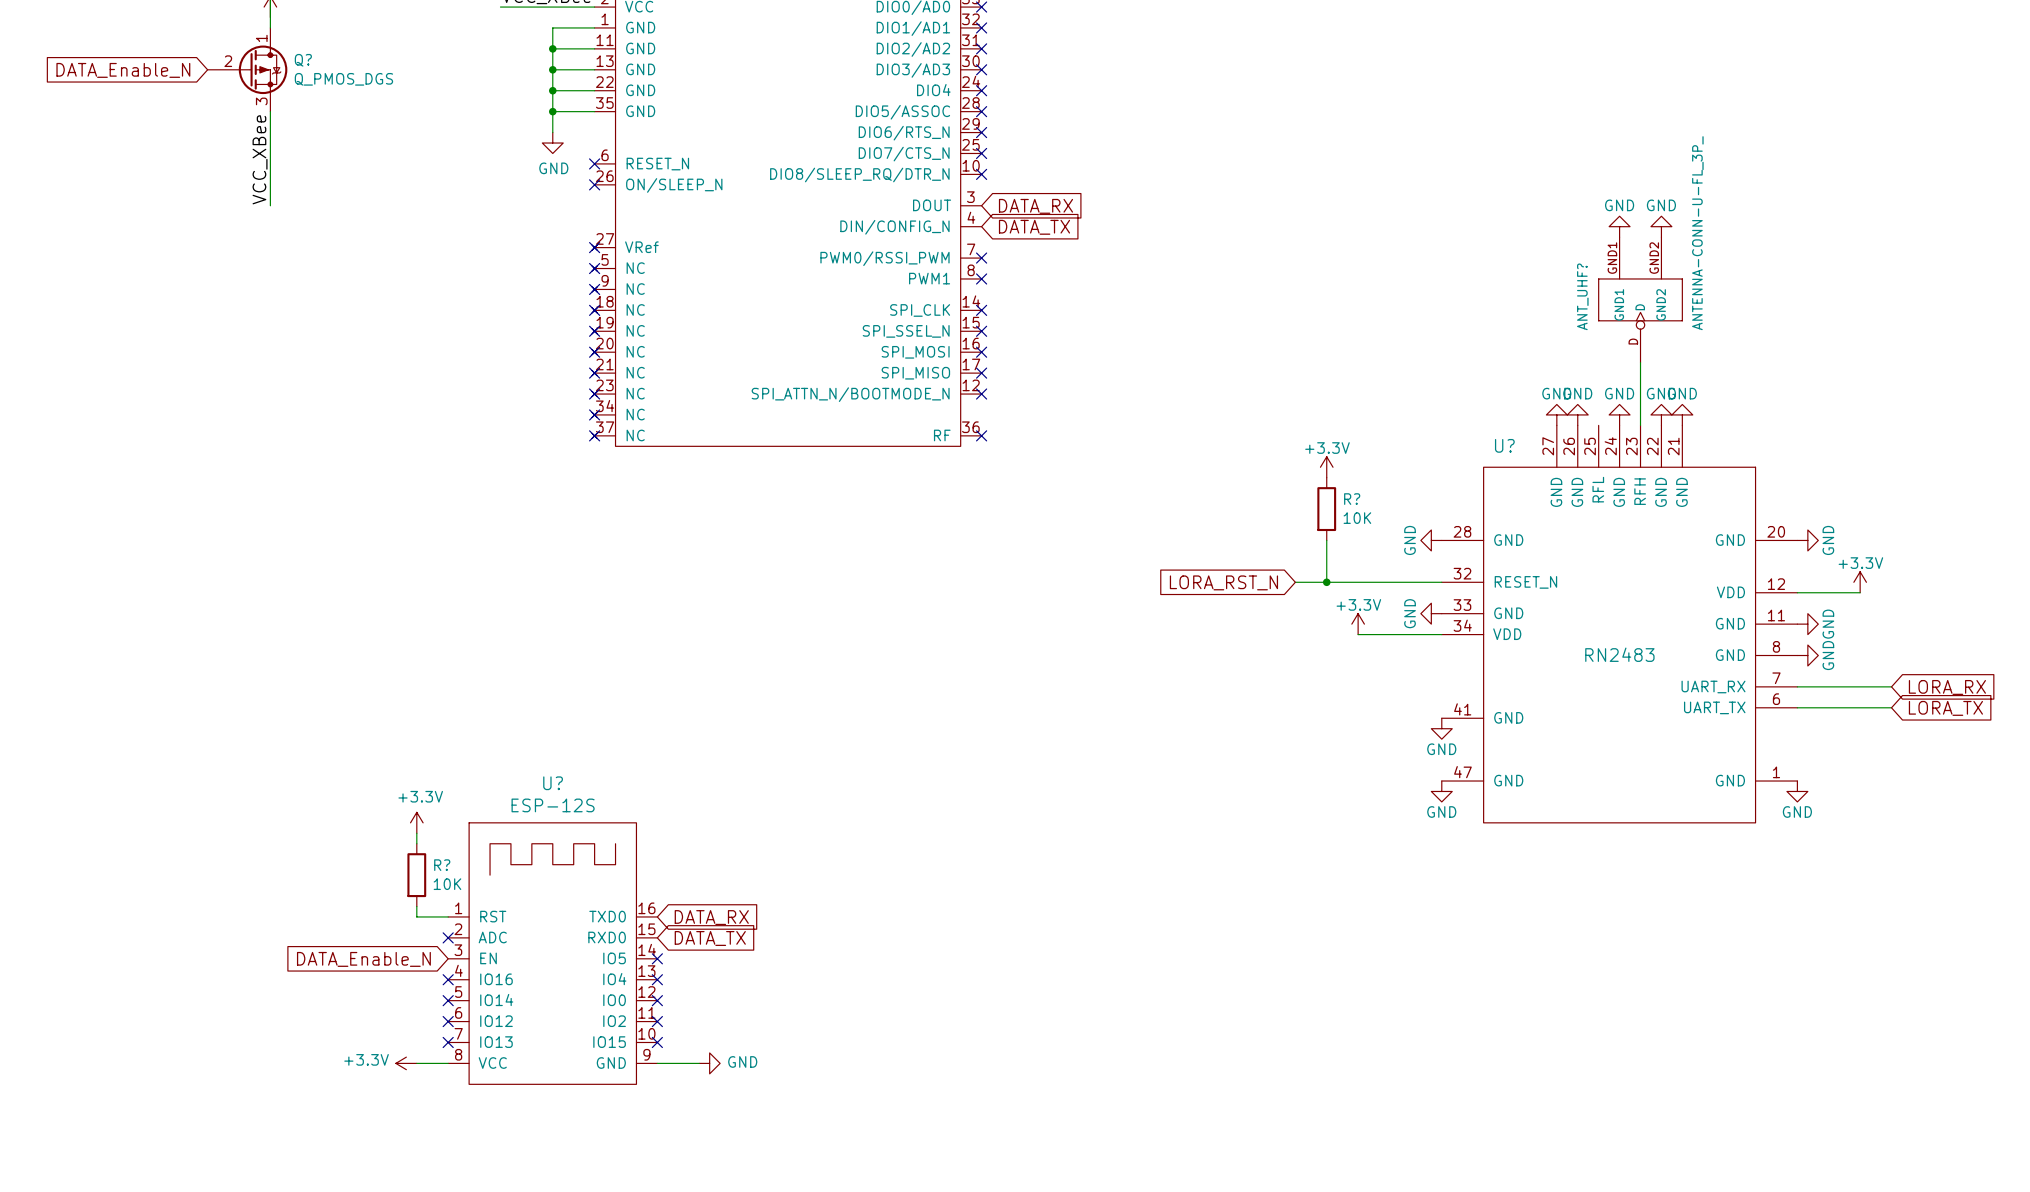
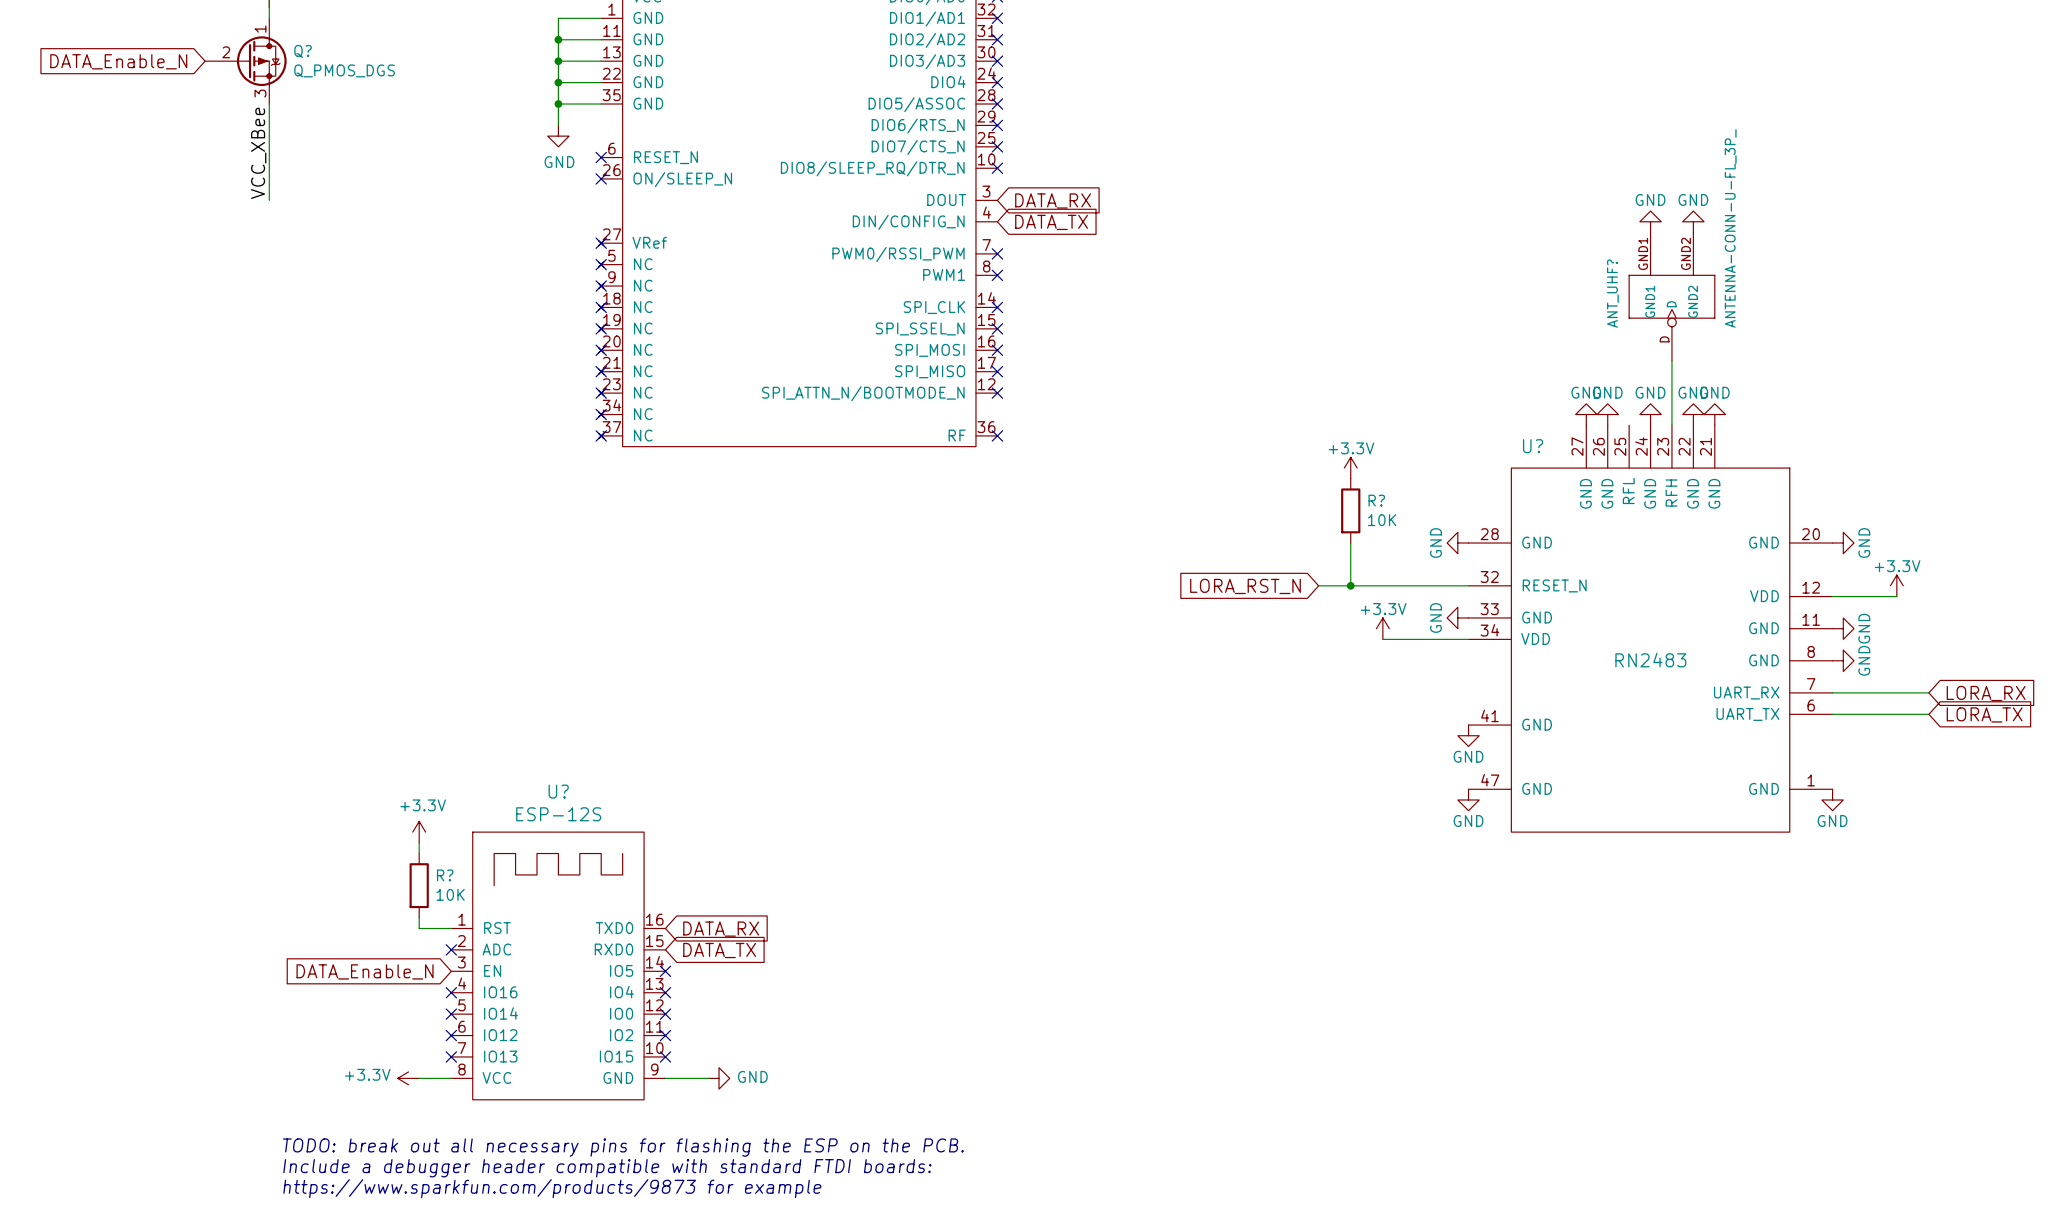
text: none -> TODO: break out all necessary pins for flashing the ESP on the PCB. (623, 1147)
text: none -> Include a debugger header compatible with standard FTDI boards: (607, 1168)
text: none -> https://www.sparkfun.com/products/9873 for example (552, 1188)

